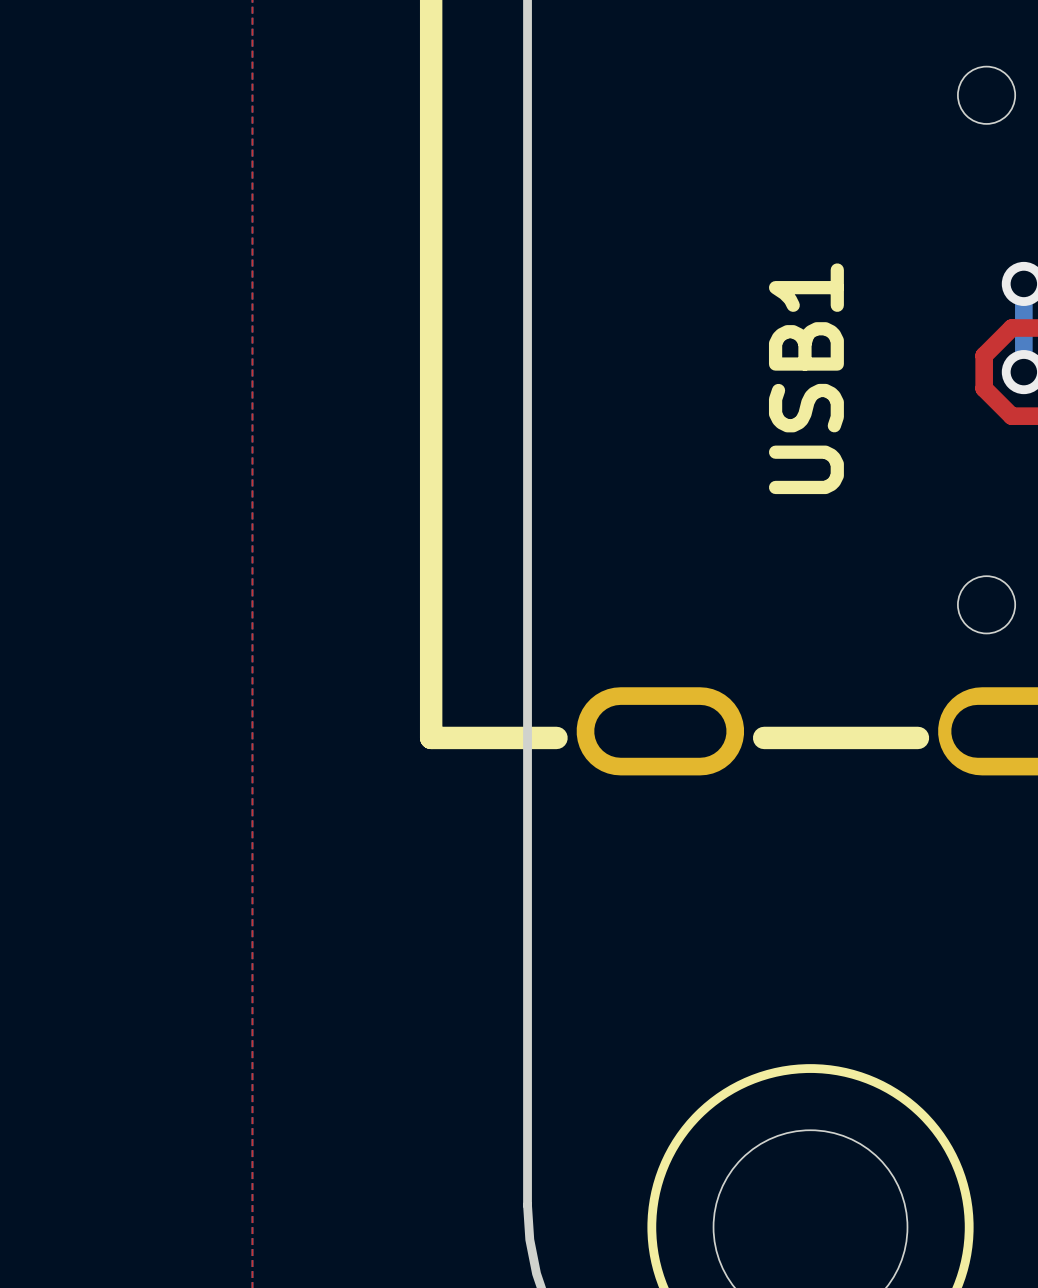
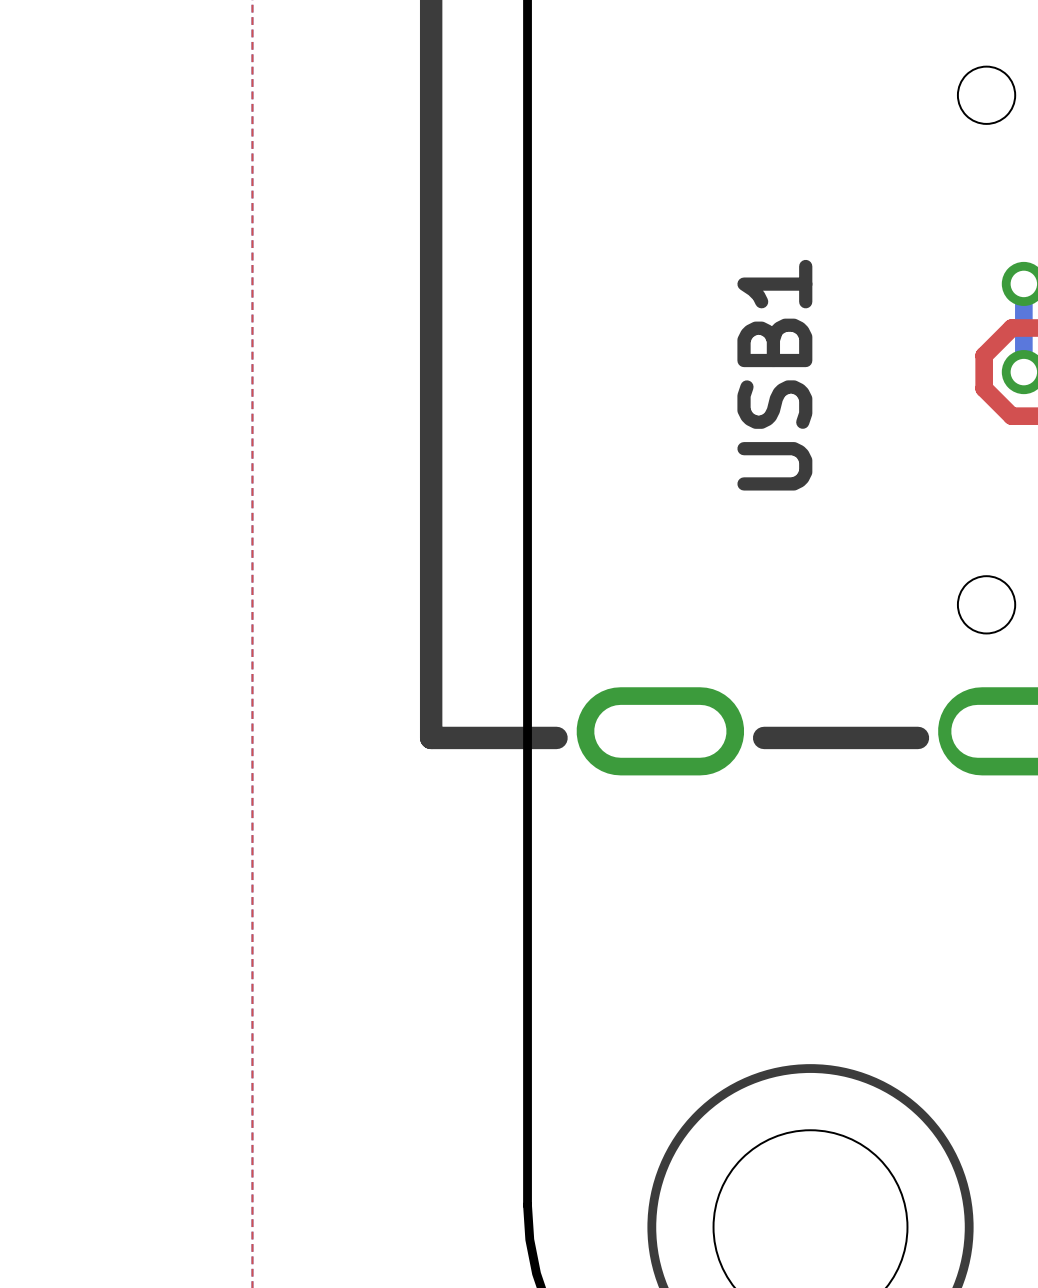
USB1 name position: USB1 (806, 378) -> USB1 (774, 375)

